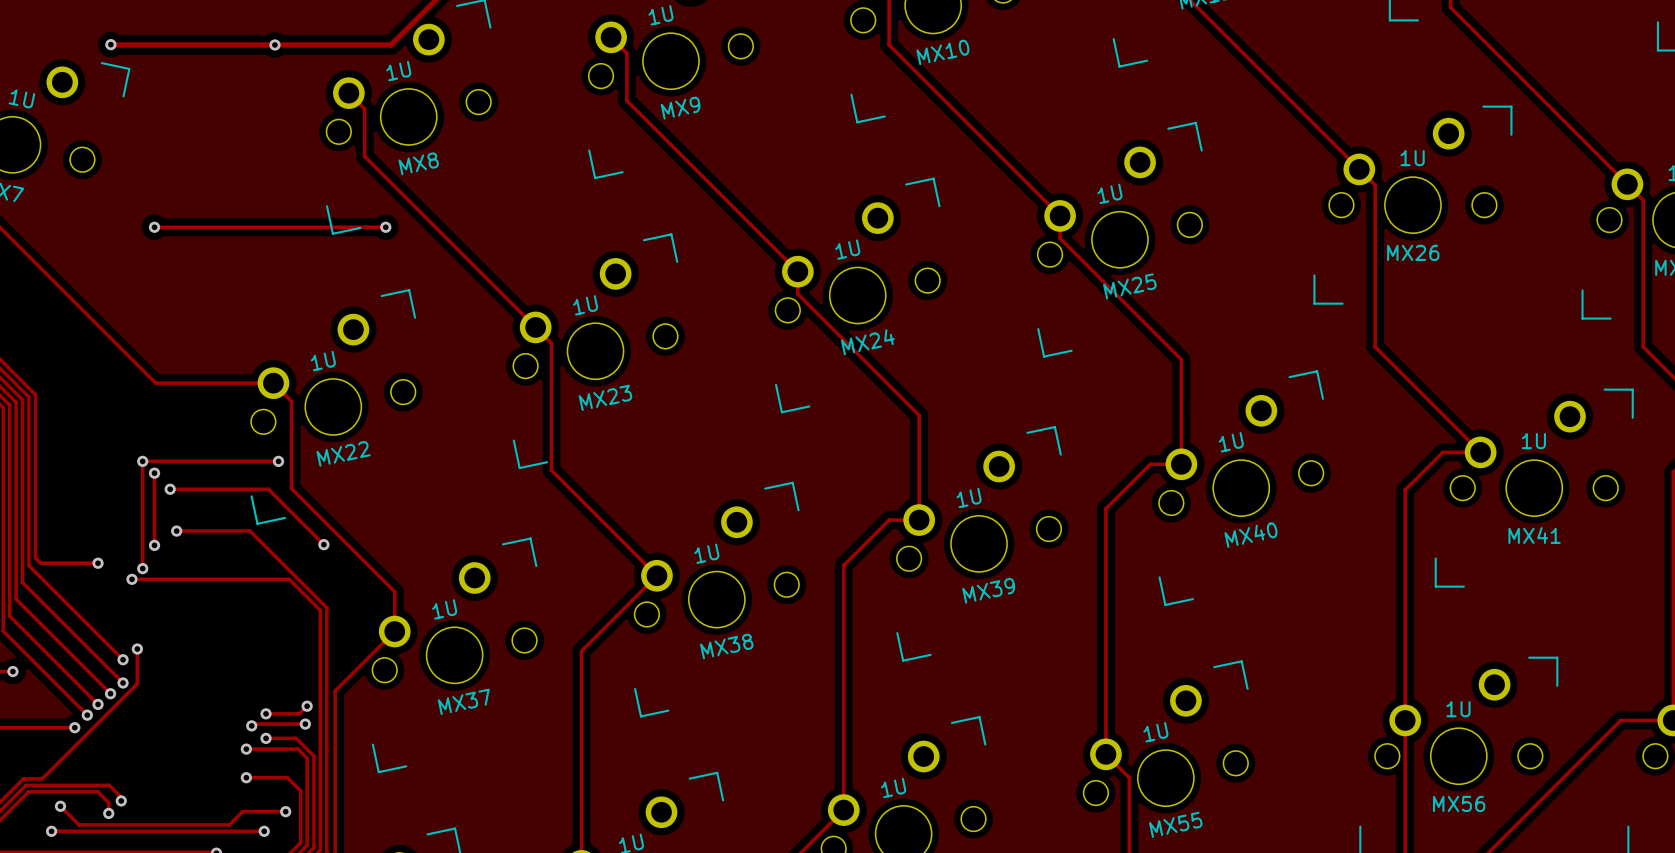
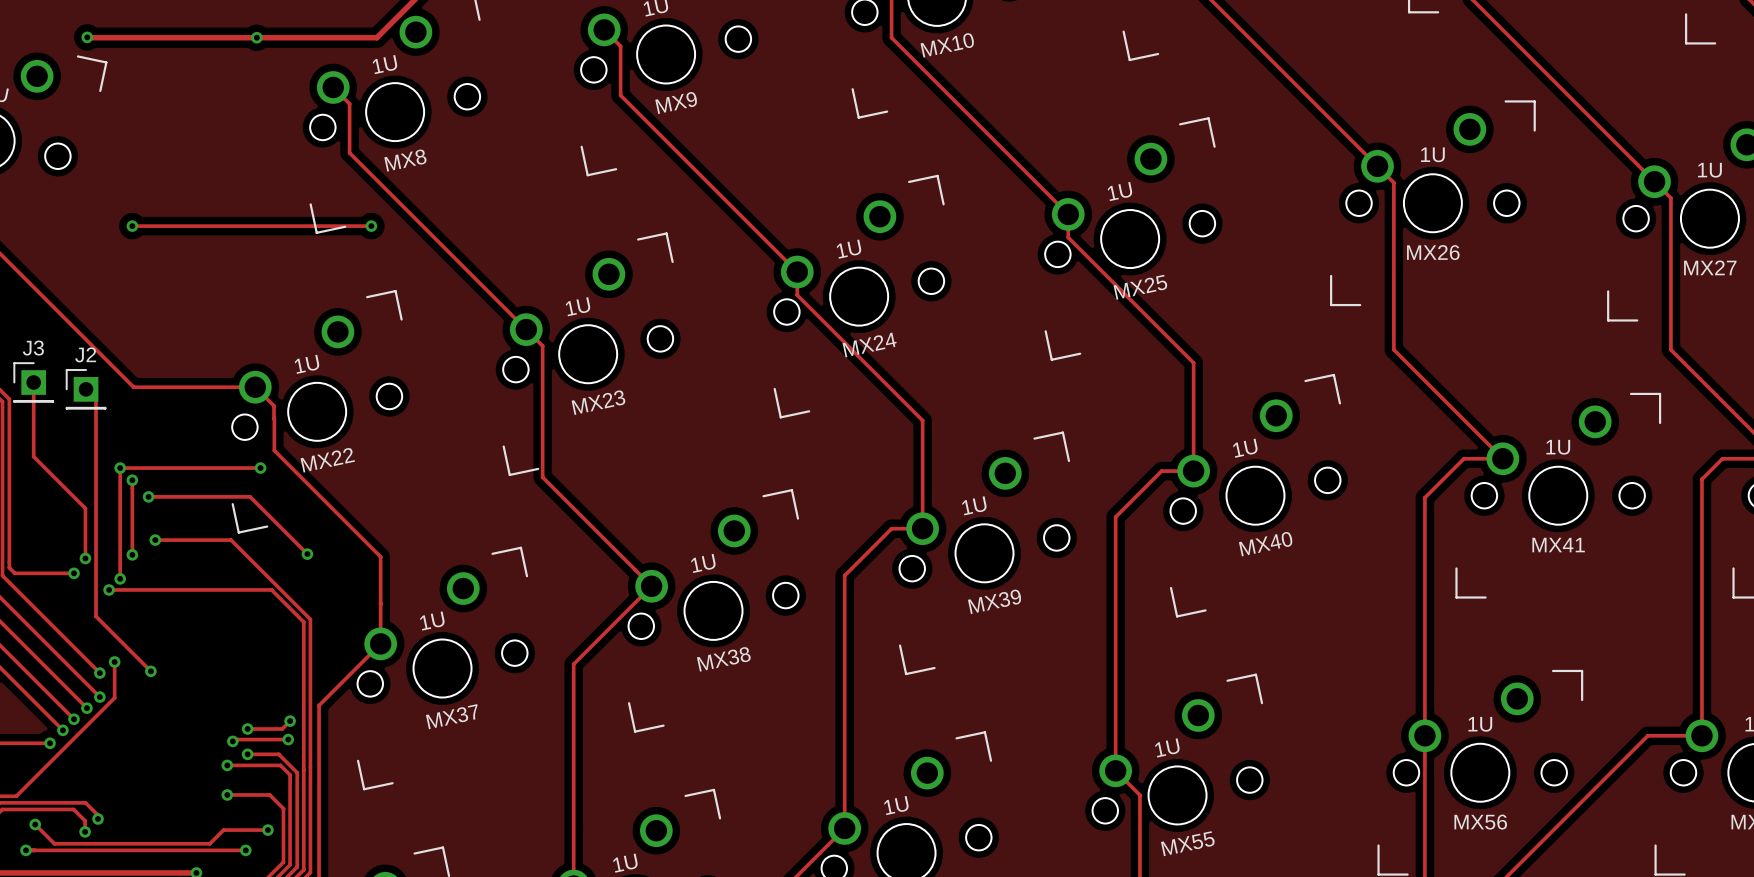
track: none -> (33, 382) (33, 456) (85, 508) (85, 558)
J3: none -> (33, 382)
track: none -> (86, 389) (96, 399) (96, 616) (150, 671)
J2: none -> (86, 389)
track: (291, 413) (291, 488) (394, 591) -> (274, 418) (274, 450) (380, 556) (380, 602)
via: none -> (85, 558)
via: none -> (150, 671)

